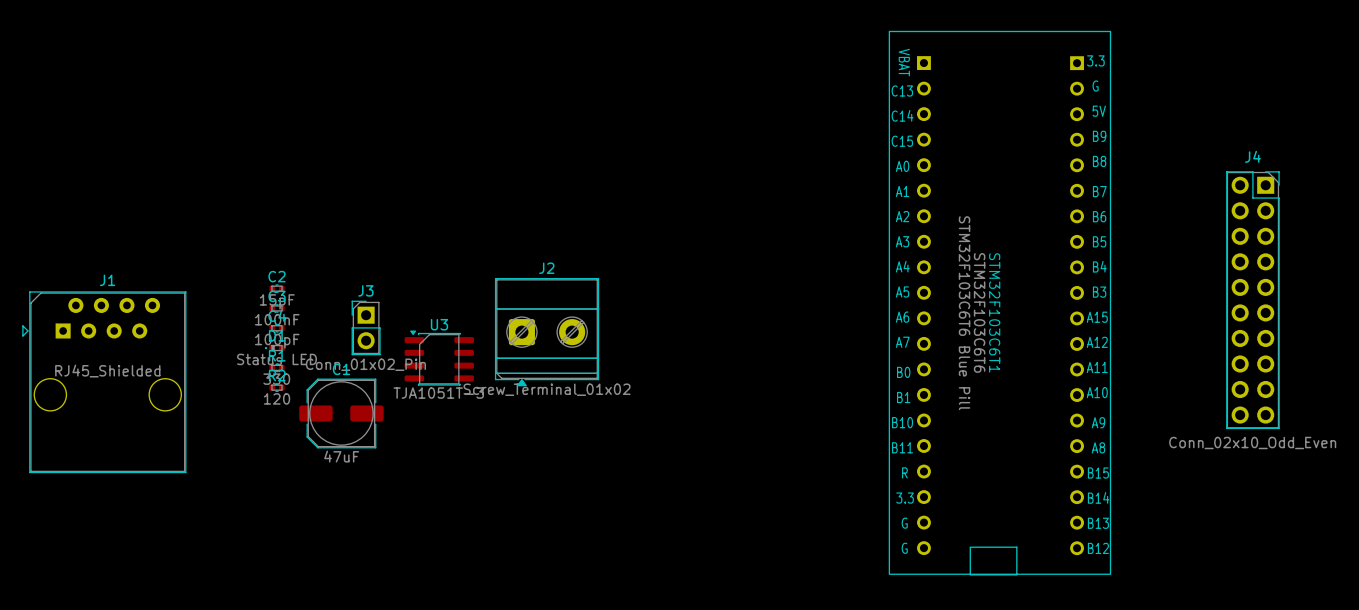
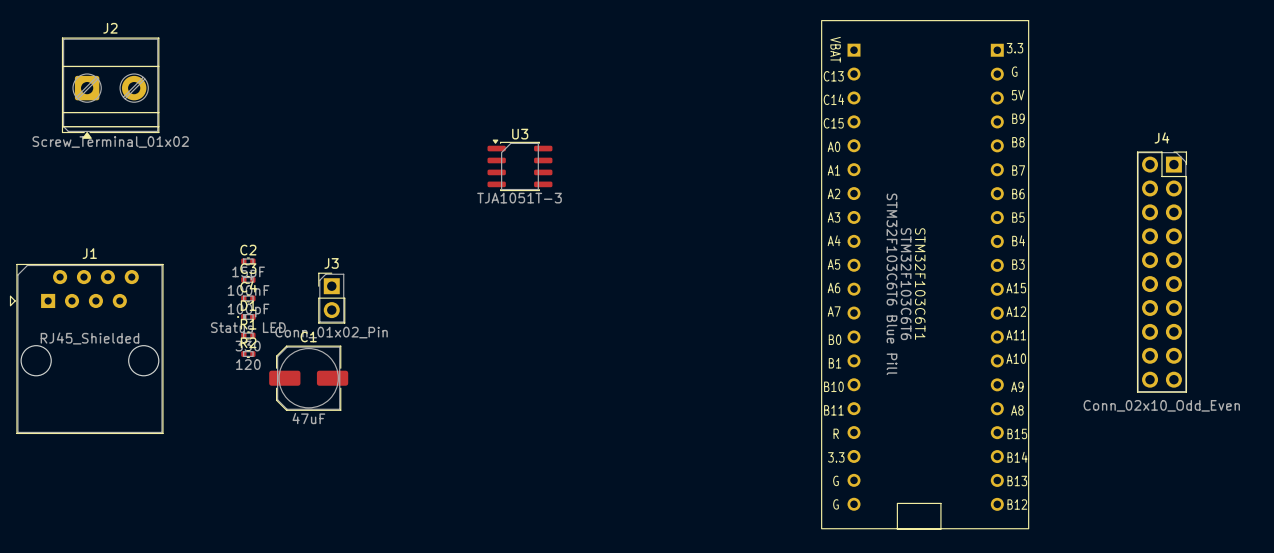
J2 position: (547, 332) -> (110, 88)
U3 position: (439, 358) -> (519, 165)

